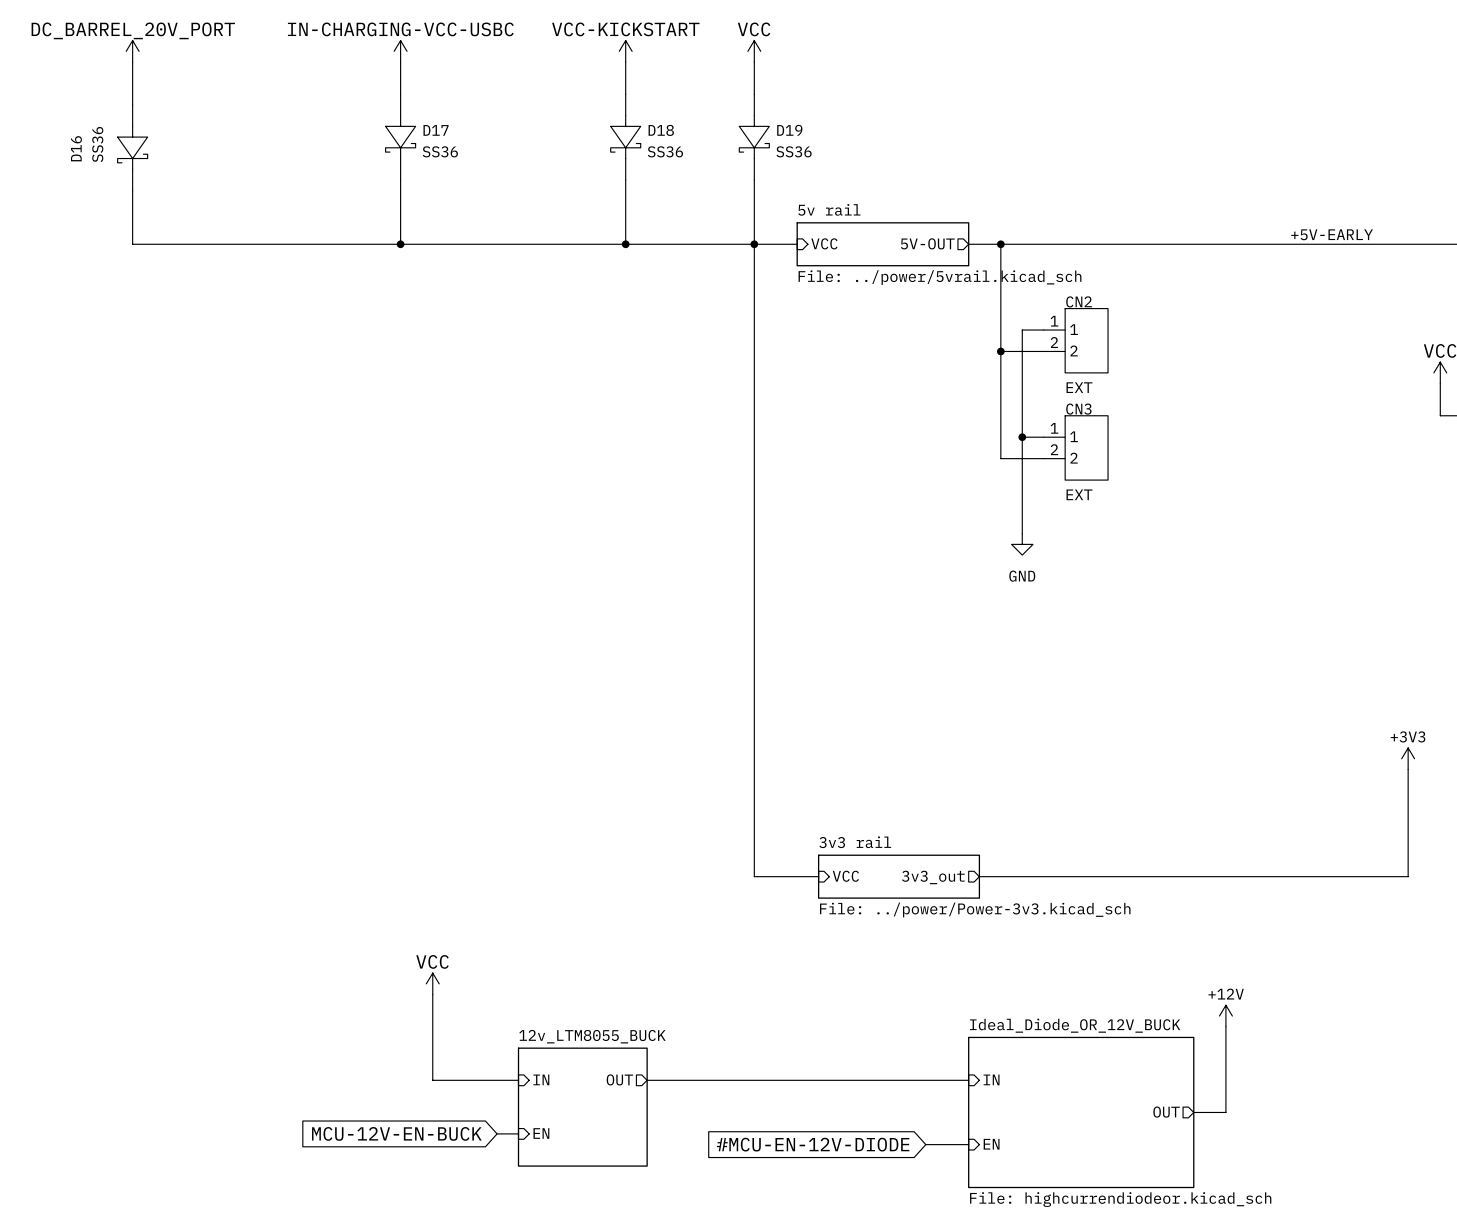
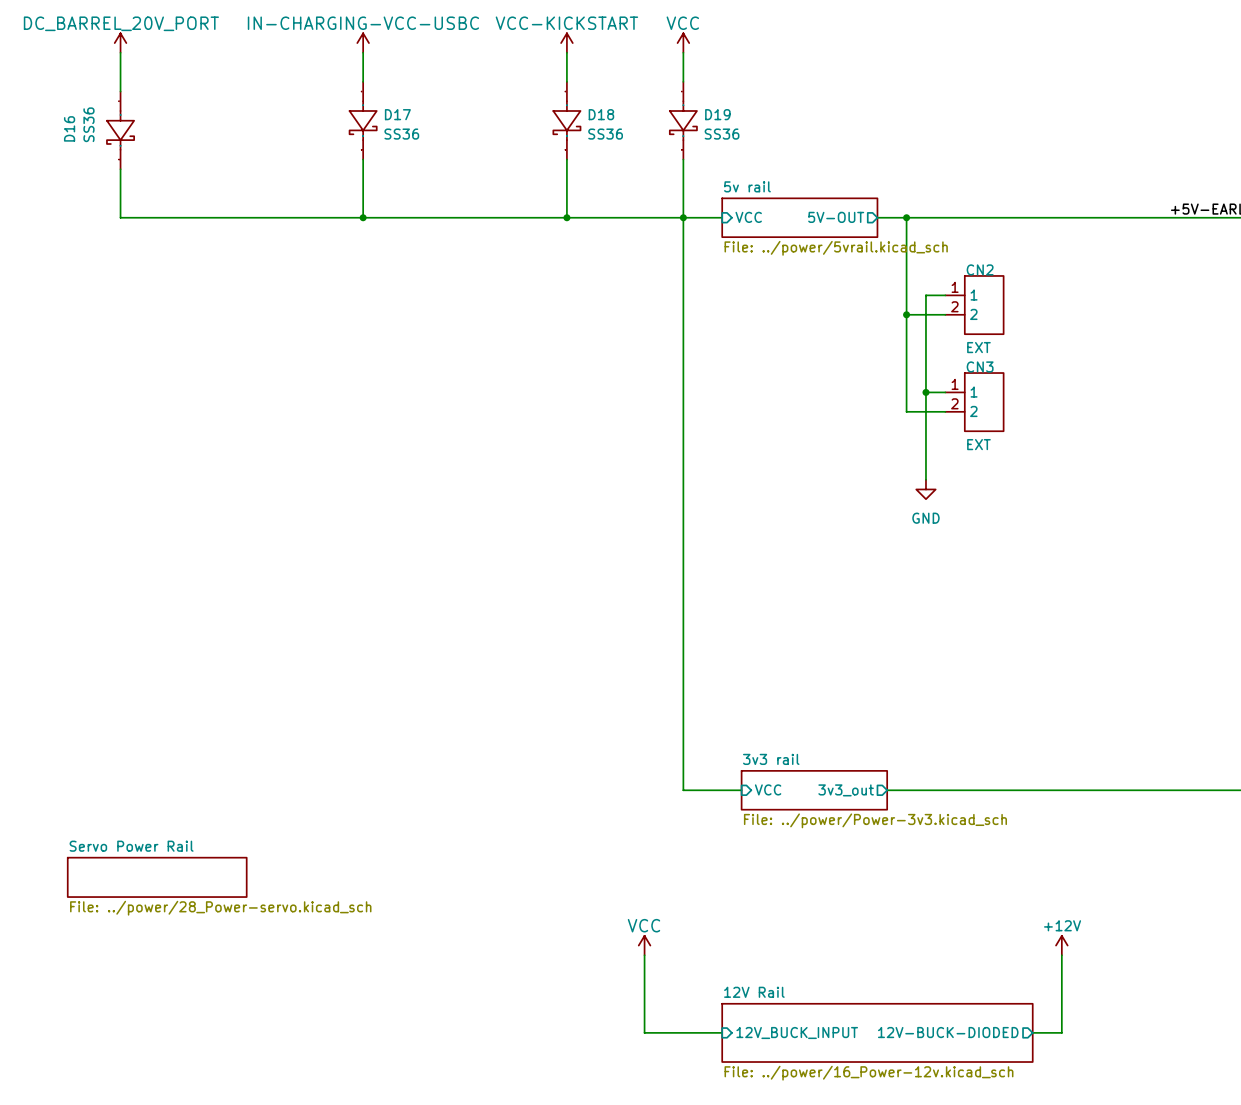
sheet Servo Power Rail: none -> File: ../power/28_Power-servo.kicad_sch (157, 877)
power symbol: VCC (432, 983) -> none
wire: (432, 994) (432, 1080) (518, 1080) -> none
power symbol position: +12V (1225, 1016) -> +12V (1061, 945)
wire: (1225, 1026) (1225, 1112) (1193, 1112) -> (1061, 955) (1061, 1032) (1032, 1032)
power symbol: none -> VCC (644, 945)
wire: none -> (644, 955) (644, 1032) (722, 1032)
sheet pin: IN (541, 1079) -> none
sheet pin: OUT (619, 1079) -> none
sheet pin: IN (991, 1079) -> none
wire: (647, 1080) (968, 1080) -> none
sheet 12v_LTM8055_BUCK: (582, 1107) -> none
sheet Ideal_Diode_OR_12V_BUCK: File: highcurrendiodeor.kicad_sch (1081, 1112) -> none
sheet pin: OUT (1166, 1112) -> none
global label: MCU-12V-EN-BUCK (396, 1133) -> none
wire: (497, 1133) (518, 1133) -> none
sheet pin: EN (541, 1133) -> none
global label: #MCU-EN-12V-DIODE (813, 1144) -> none
wire: (925, 1144) (968, 1144) -> none
sheet 12V Rail: none -> File: ../power/16_Power-12v.kicad_sch (877, 1032)
sheet pin: EN (991, 1144) -> none
sheet pin: none -> 12V-BUCK-DIODED (948, 1032)
sheet pin: none -> 12V_BUCK_INPUT (797, 1032)

